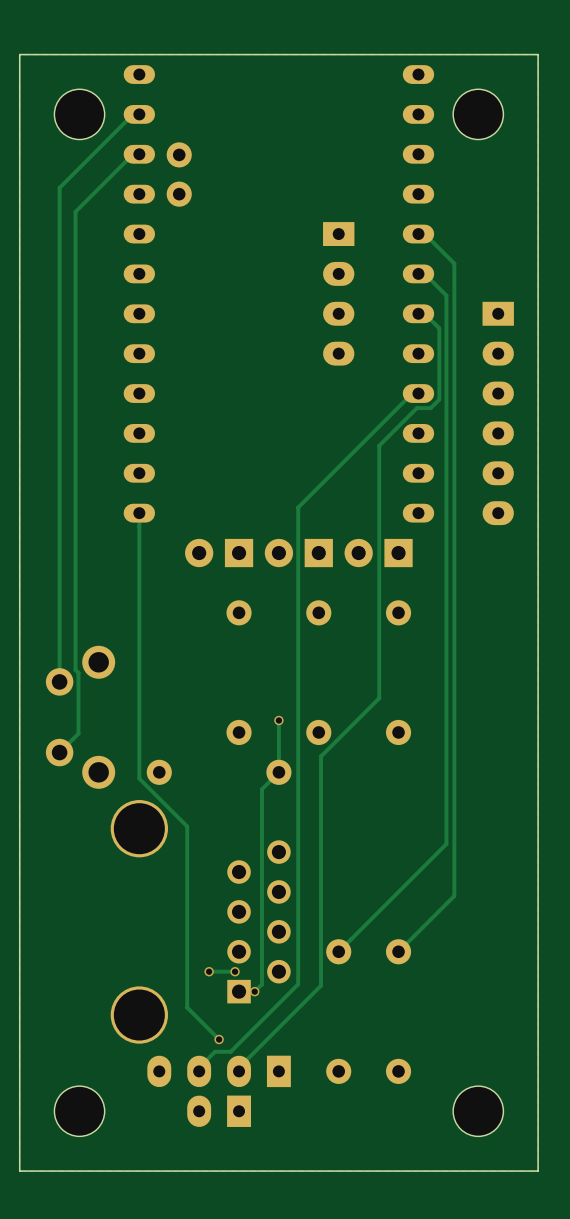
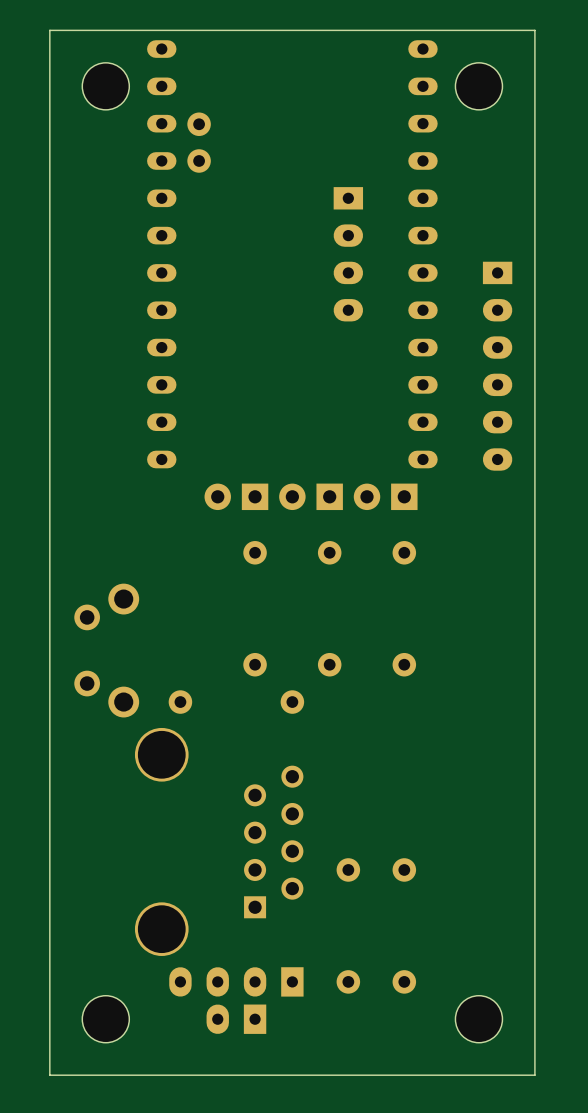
track: (139, 114) (133, 114) (59, 187) (59, 681) -> none
track: (139, 154) (133, 154) (75, 211) (75, 669) (78, 672) (78, 733) (59, 752) -> none
track: (418, 234) (424, 234) (454, 263) (454, 895) (398, 951) -> none
track: (418, 273) (424, 273) (446, 295) (446, 844) (338, 951) -> none
track: (418, 313) (424, 313) (439, 328) (439, 399) (430, 408) (416, 408) (379, 445) (379, 698) (321, 756) (321, 985) (239, 1067) (239, 1071) -> none
track: (418, 393) (412, 393) (298, 507) (298, 984) (230, 1051) (215, 1051) (199, 1067) (199, 1071) -> none
track: (139, 513) (139, 778) (187, 826) (187, 1007) (219, 1039) -> none
track: (278, 720) (278, 772) (261, 789) (261, 984) (254, 991) -> none
via: (278, 720) -> none
via: (209, 971) -> none
track: (235, 971) (209, 971) -> none
via: (235, 971) -> none
via: (254, 991) -> none
via: (219, 1039) -> none

